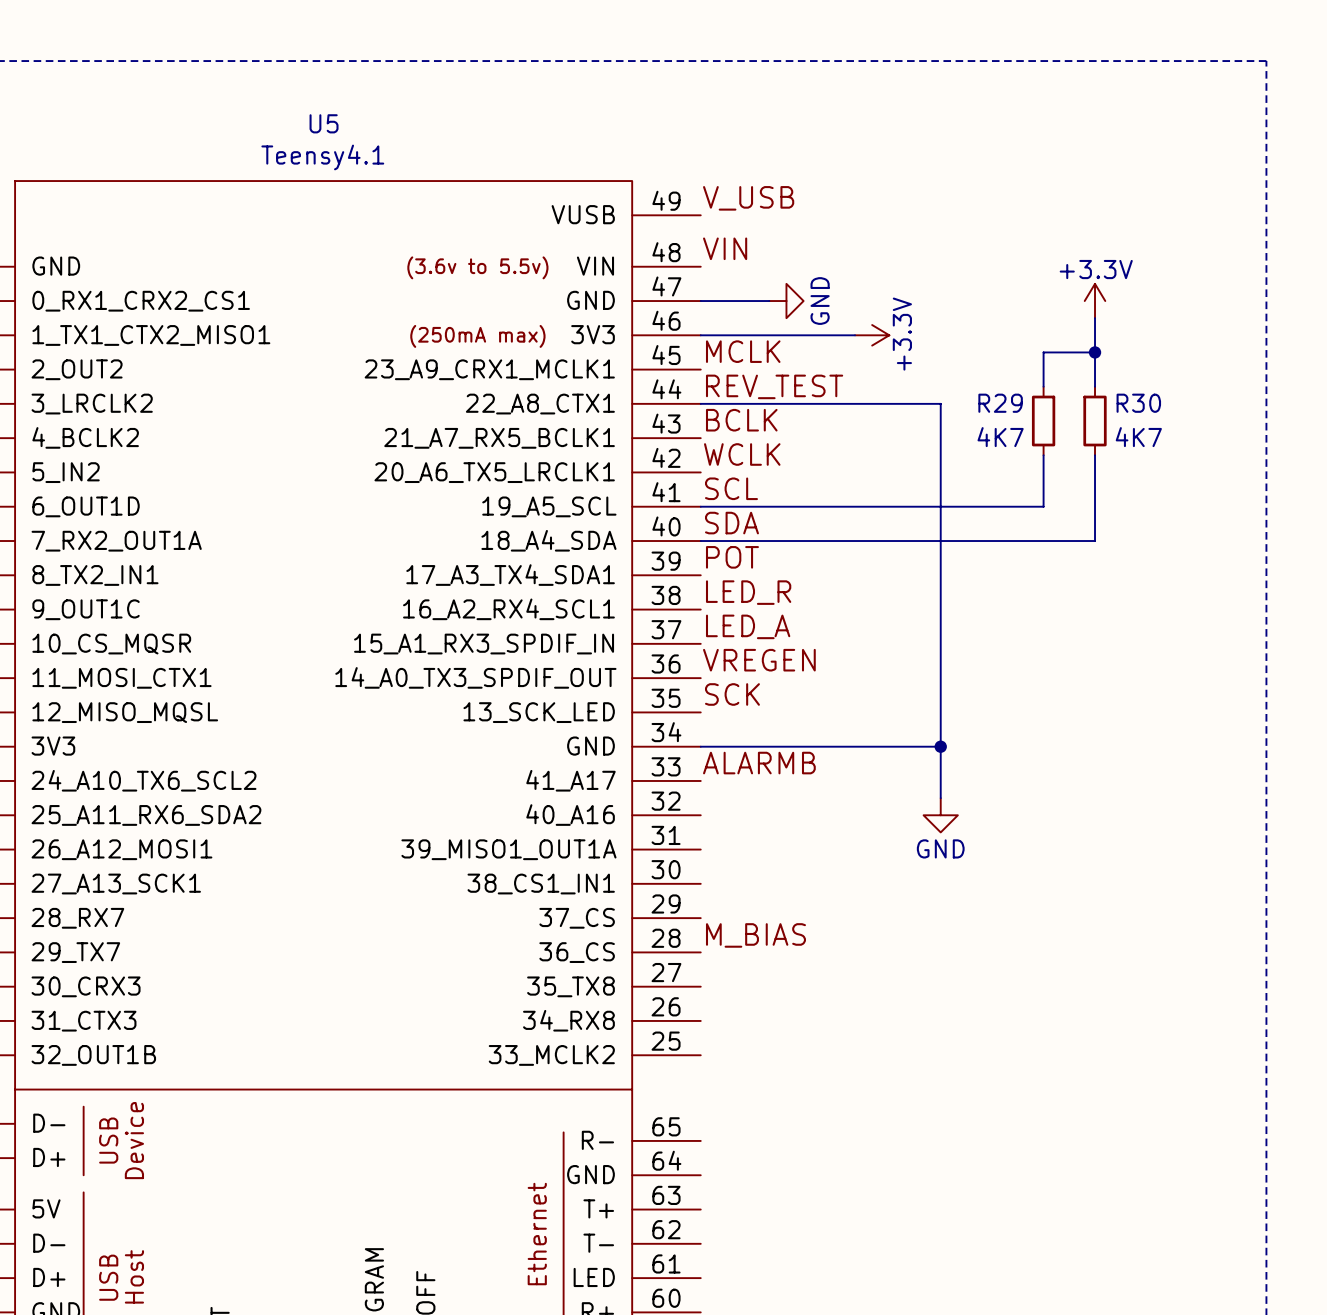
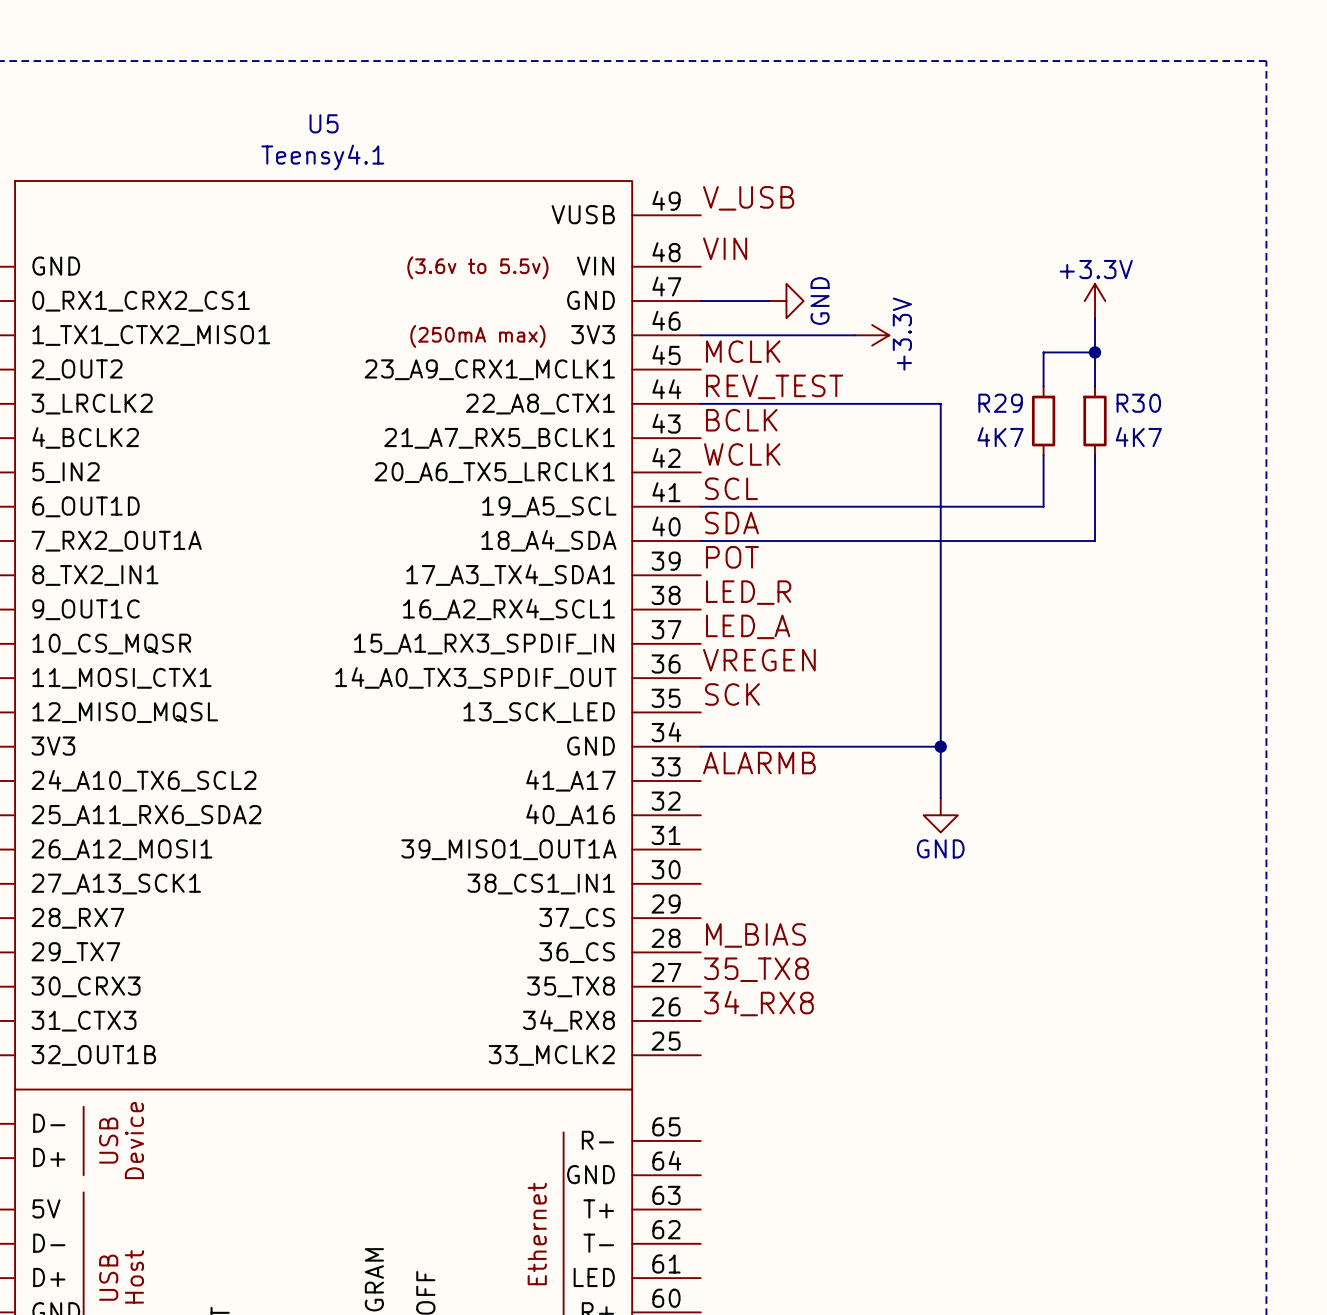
label: none -> 35_TX8 (756, 969)
label: none -> 34_RX8 (758, 1003)

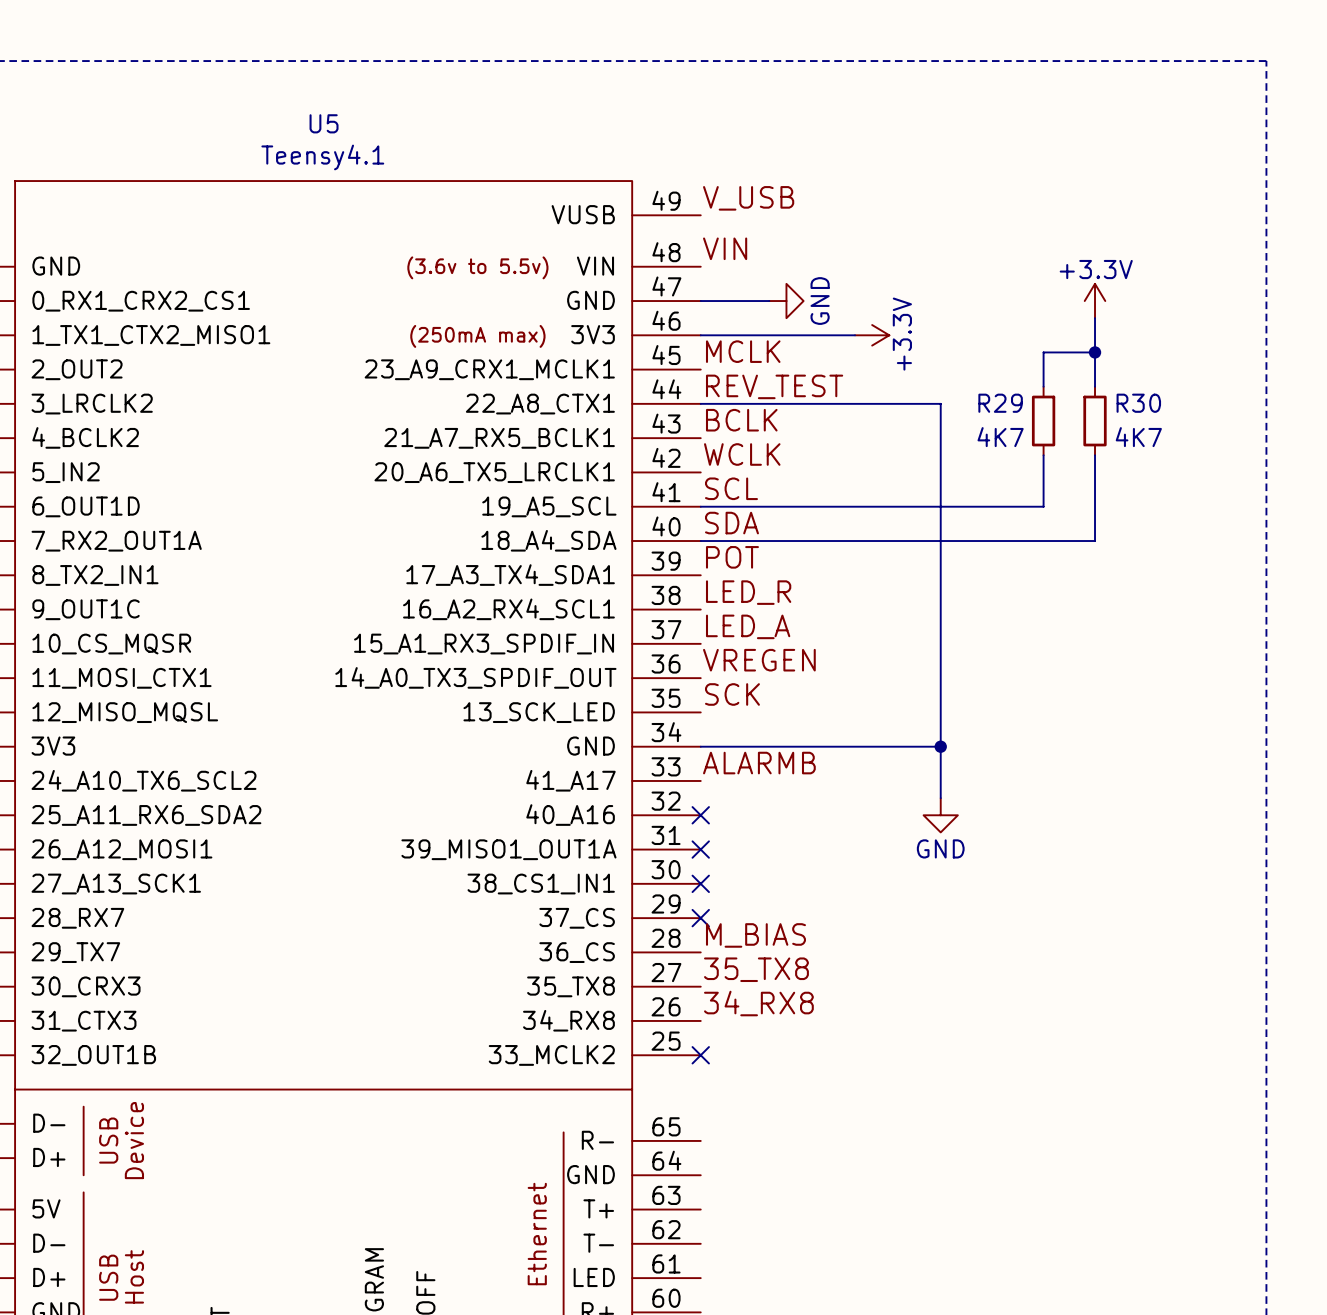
no-connect mark: none -> (700, 815)
no-connect mark: none -> (700, 849)
no-connect mark: none -> (700, 883)
no-connect mark: none -> (700, 918)
no-connect mark: none -> (700, 1055)

